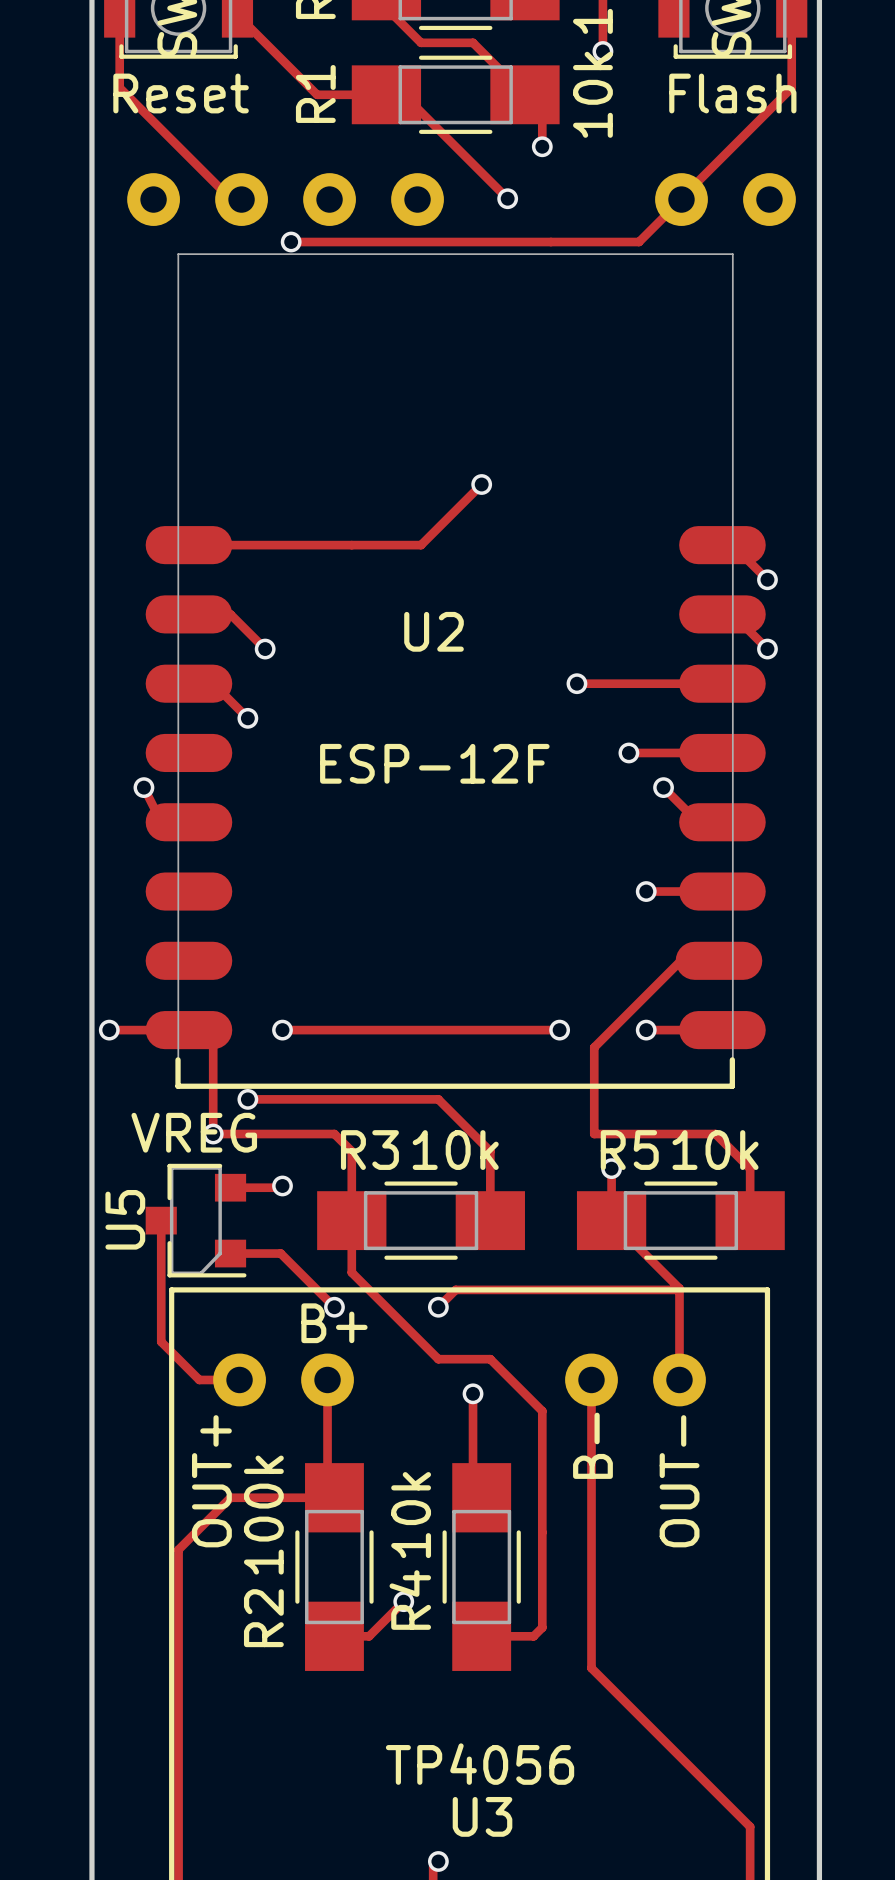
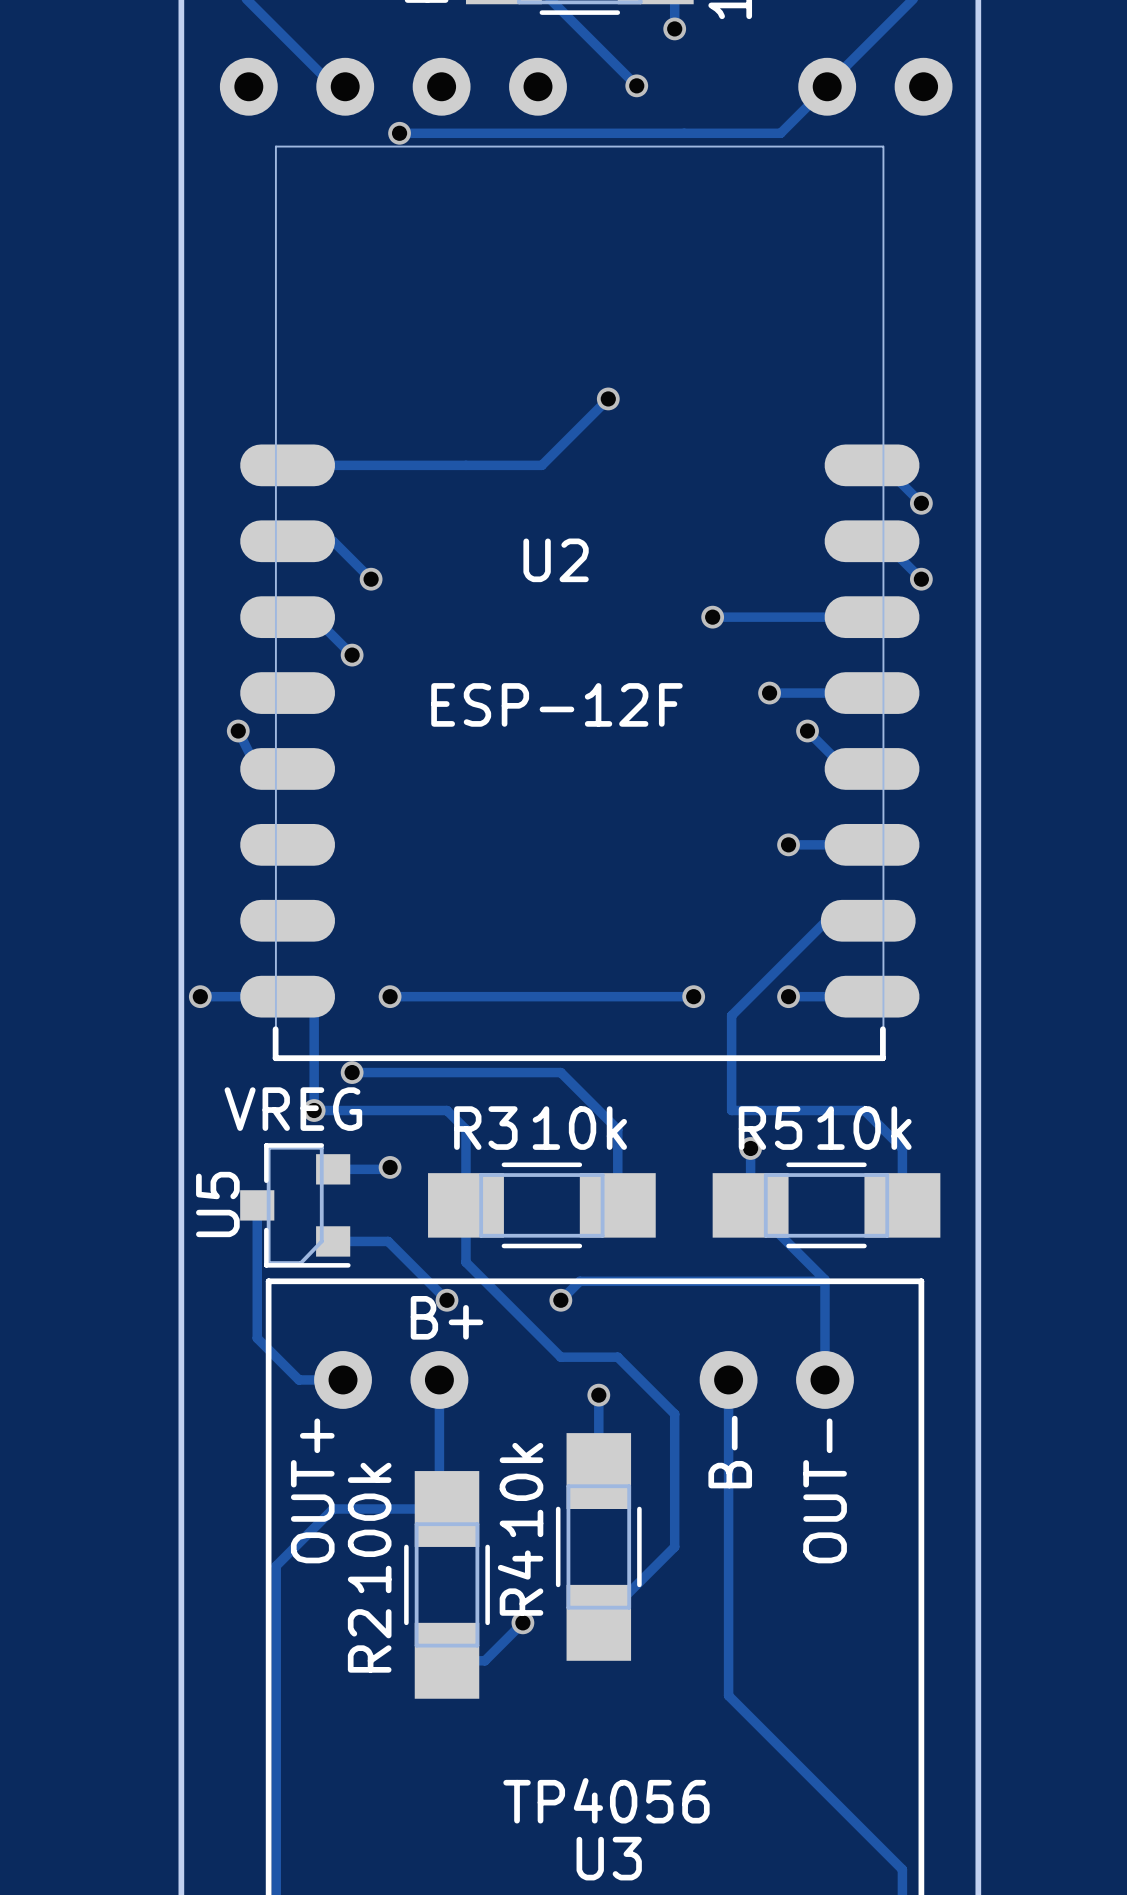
track: (542, 1532) (542, 1627) (533, 1636) (481, 1636) -> (674, 1546) (598, 1622)
R4 position: (481, 1567) -> (598, 1546)

